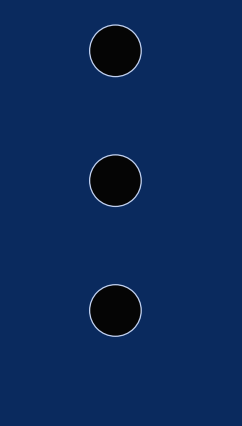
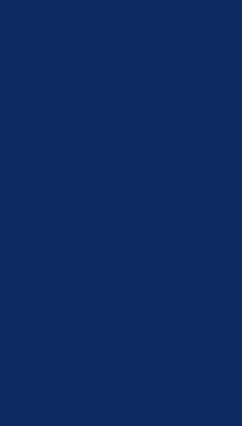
part: (115, 50) -> none
part: (115, 180) -> none
part: (115, 310) -> none

